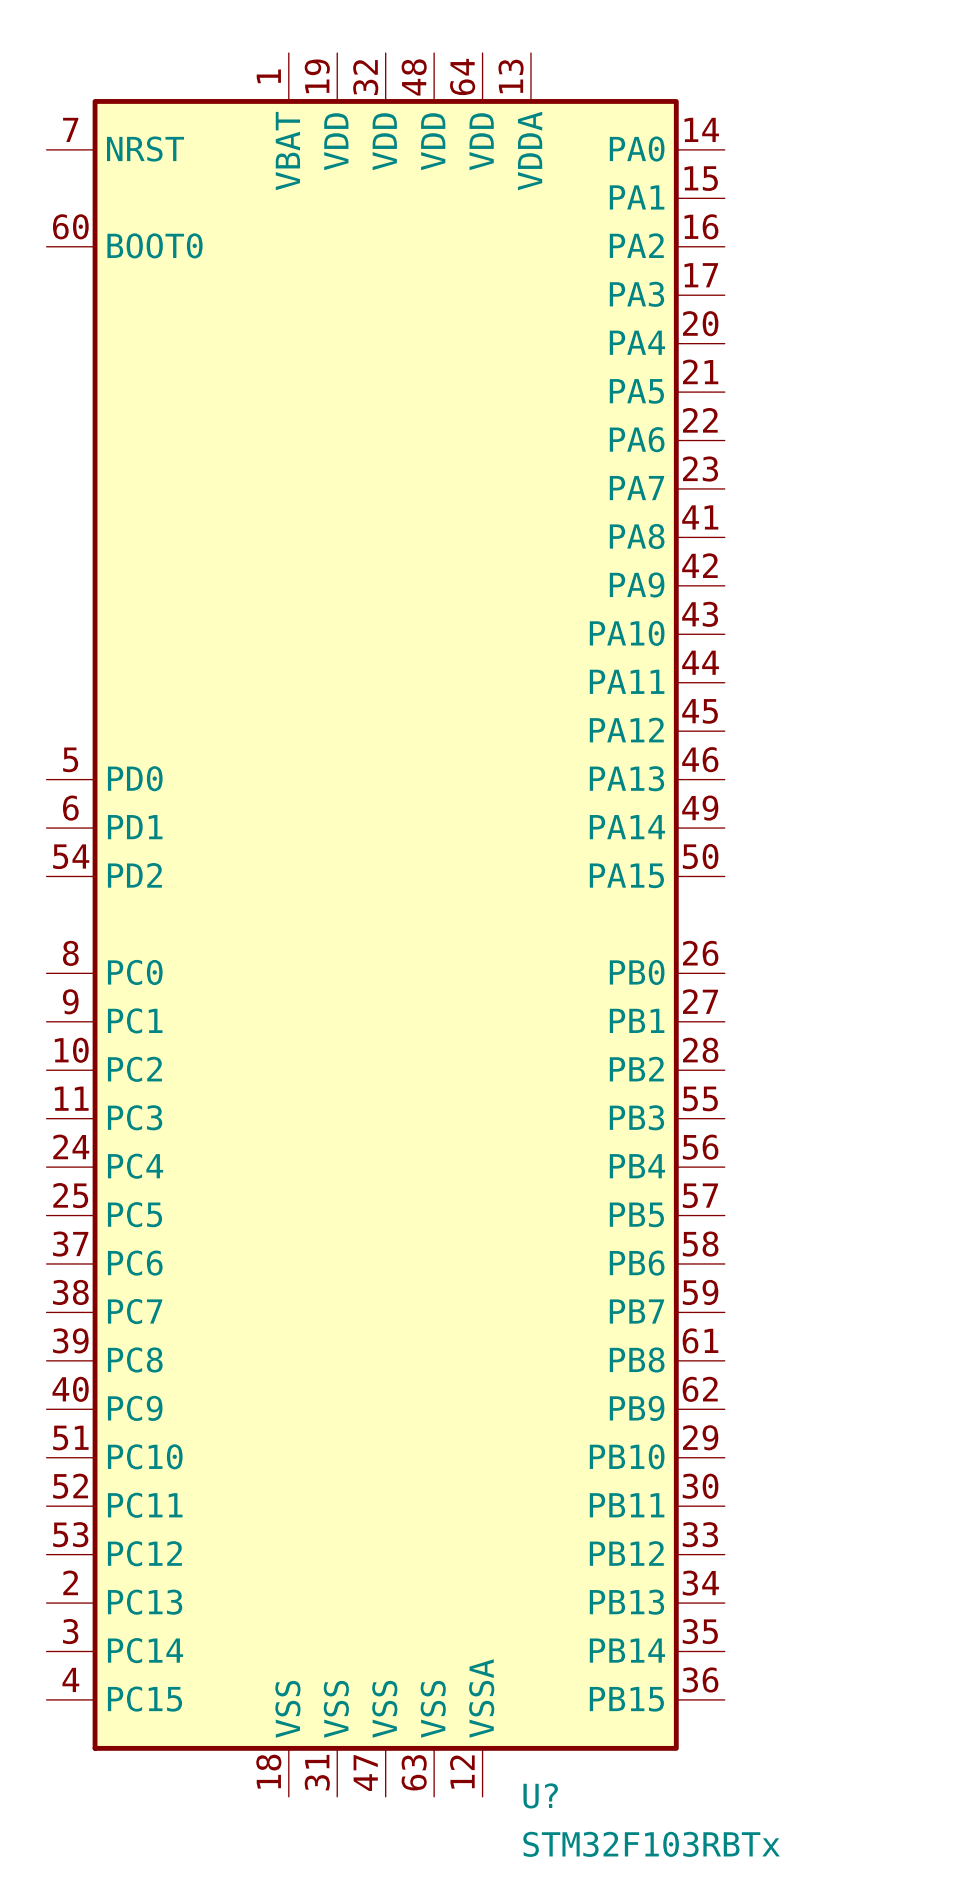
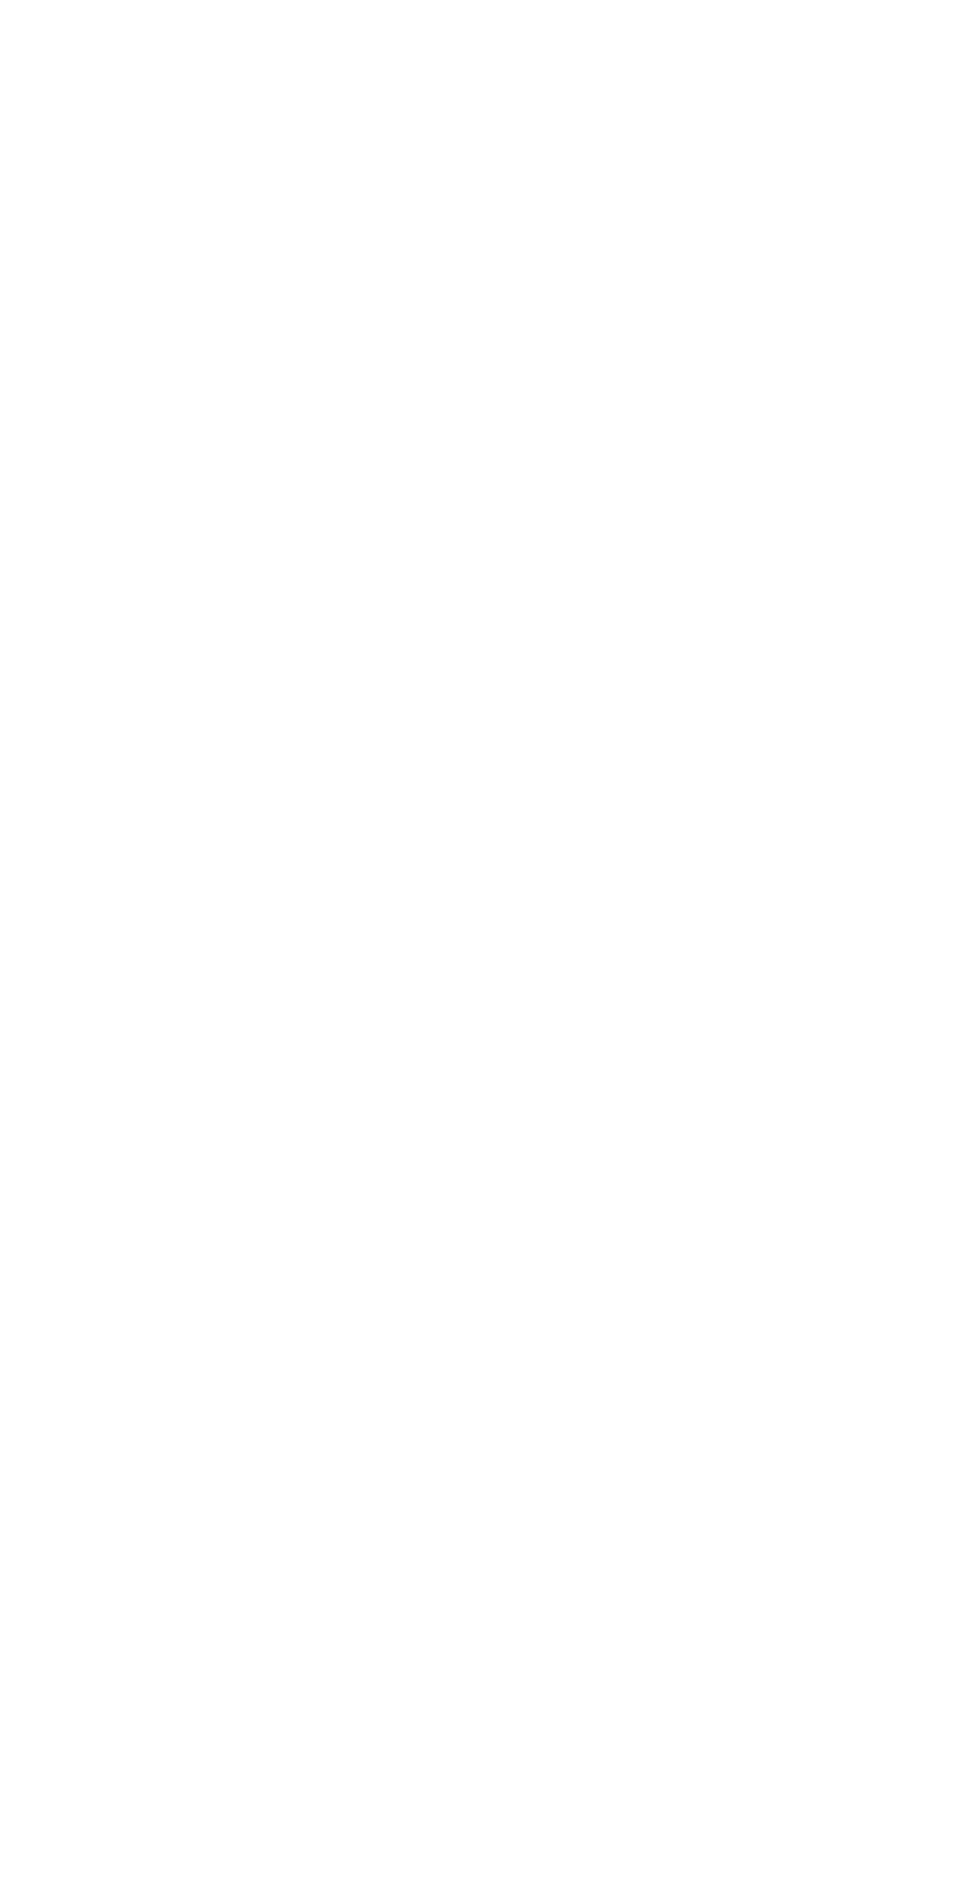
U?: STM32F103RBTx (385, 924) -> none

